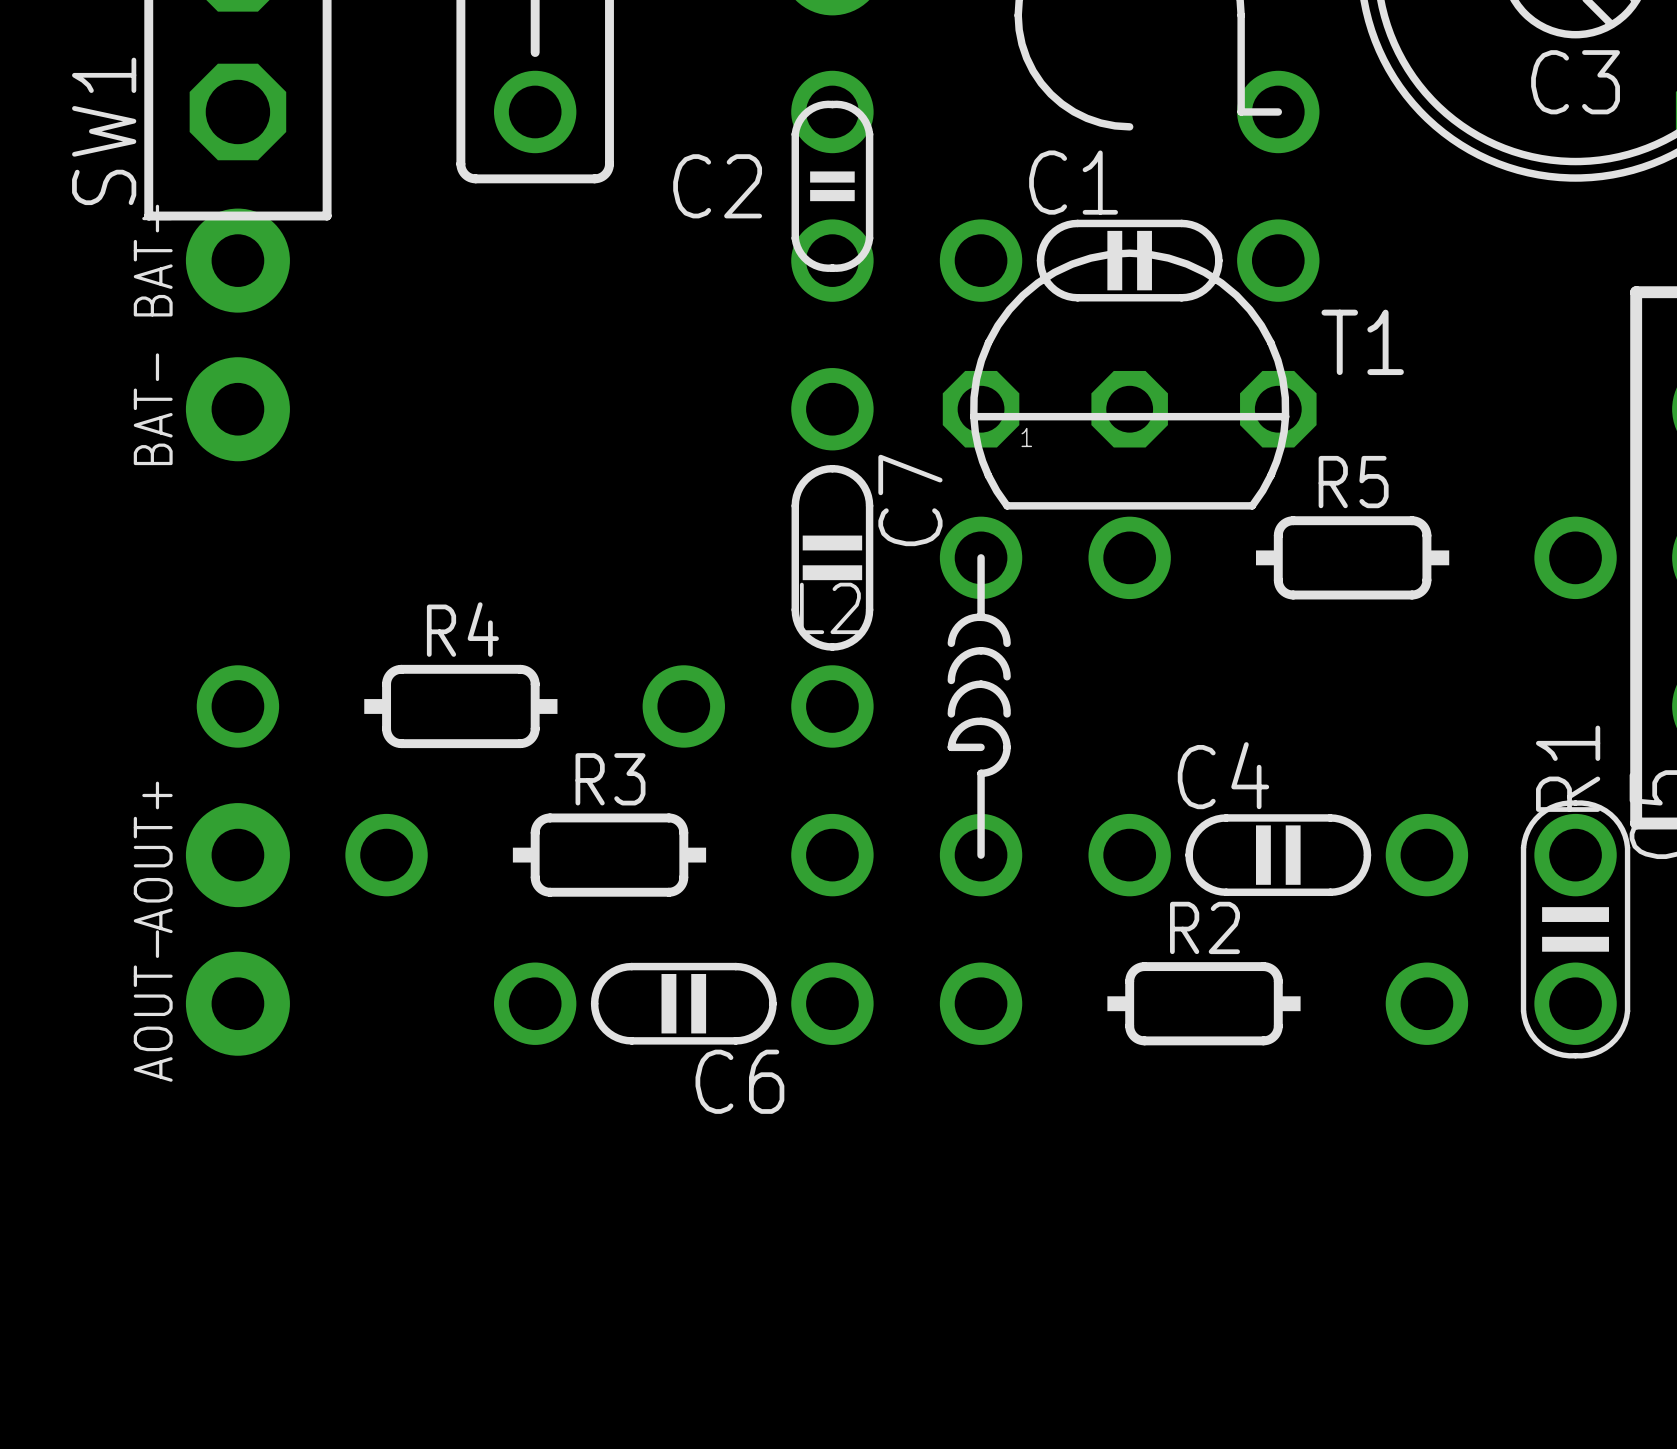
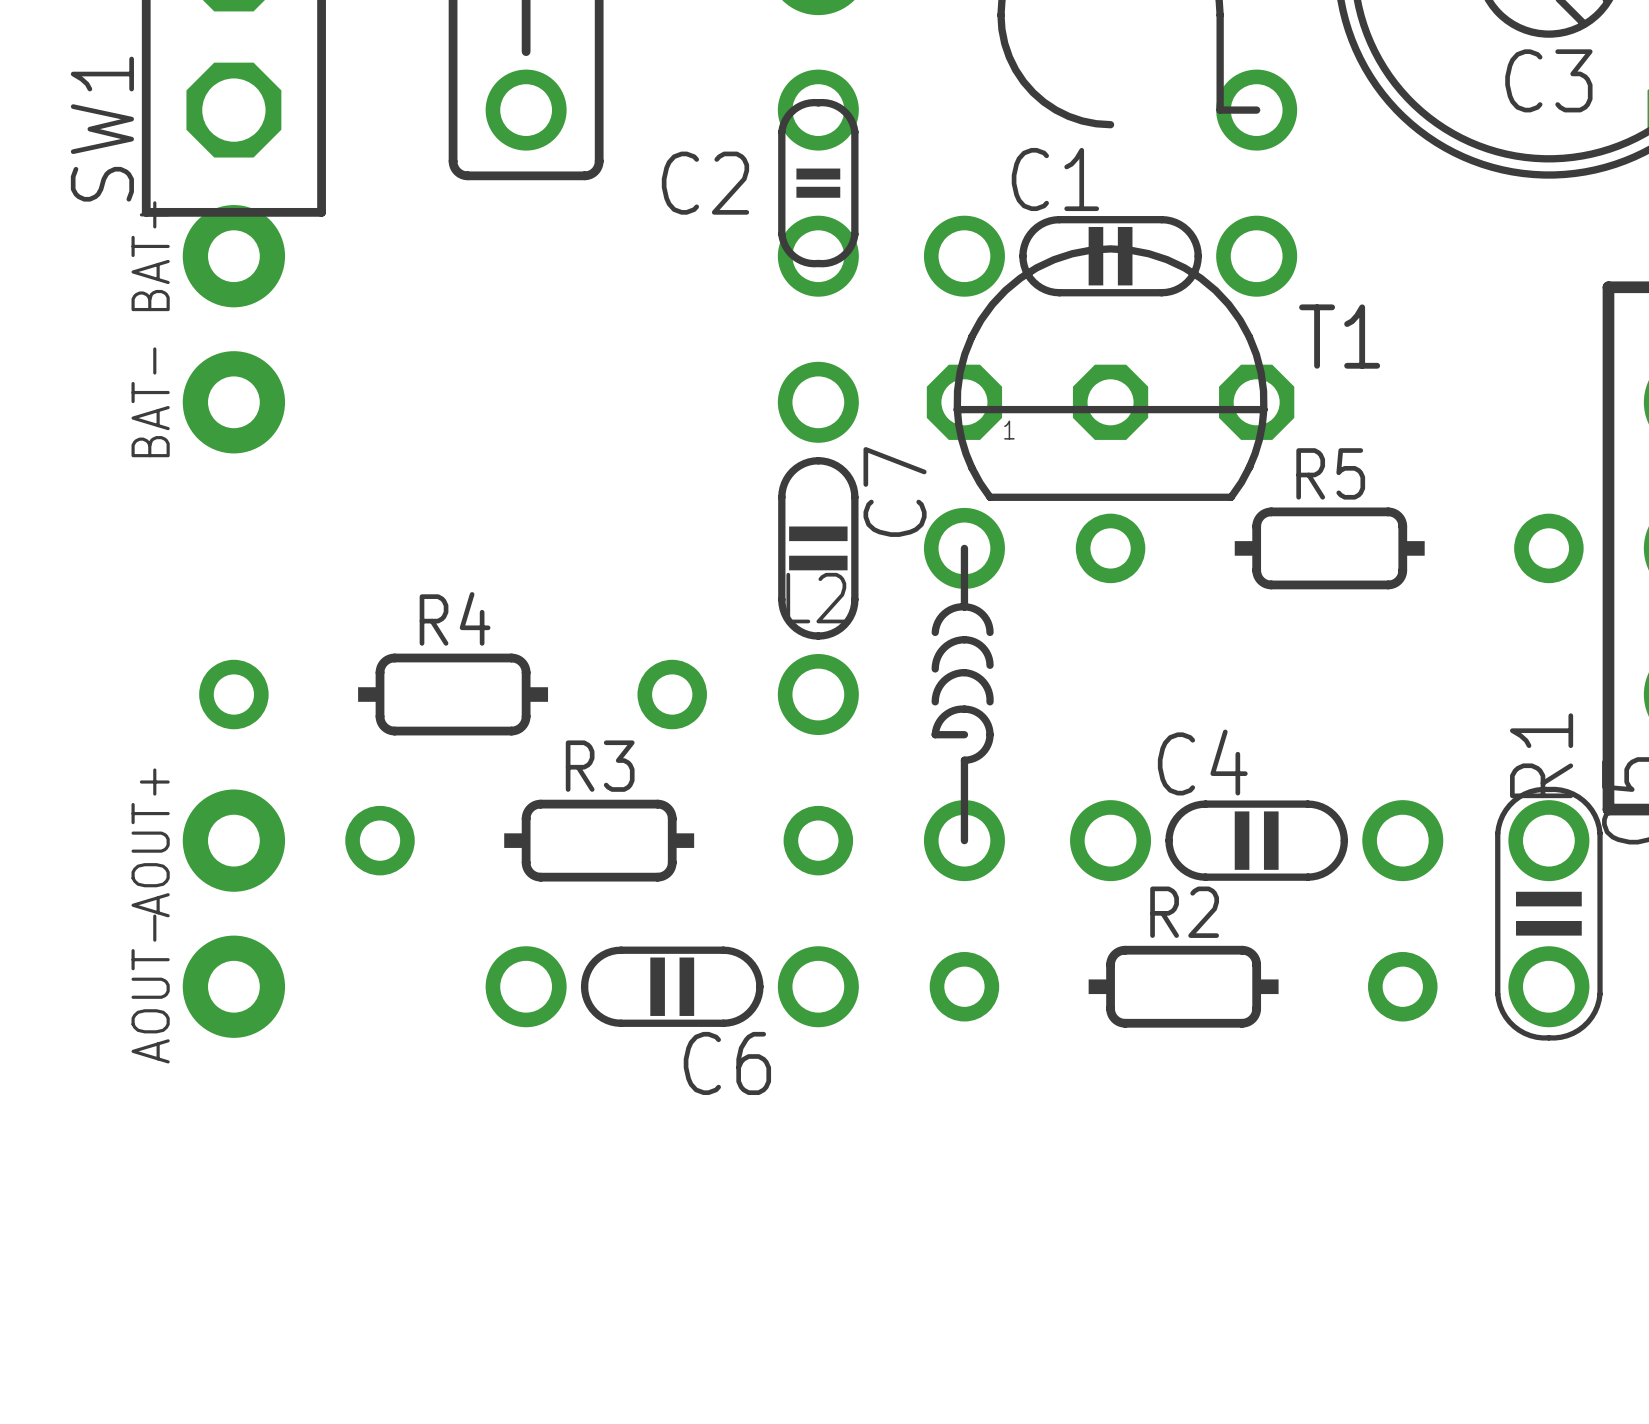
R5 footprint: [1088, 516, 1617, 600] -> [1075, 507, 1584, 590]
R4 footprint: [196, 664, 725, 749] -> [199, 653, 707, 736]
R3 footprint: [345, 813, 874, 897] -> [345, 799, 854, 882]
R2 footprint: [939, 962, 1469, 1046] -> [929, 945, 1438, 1028]

